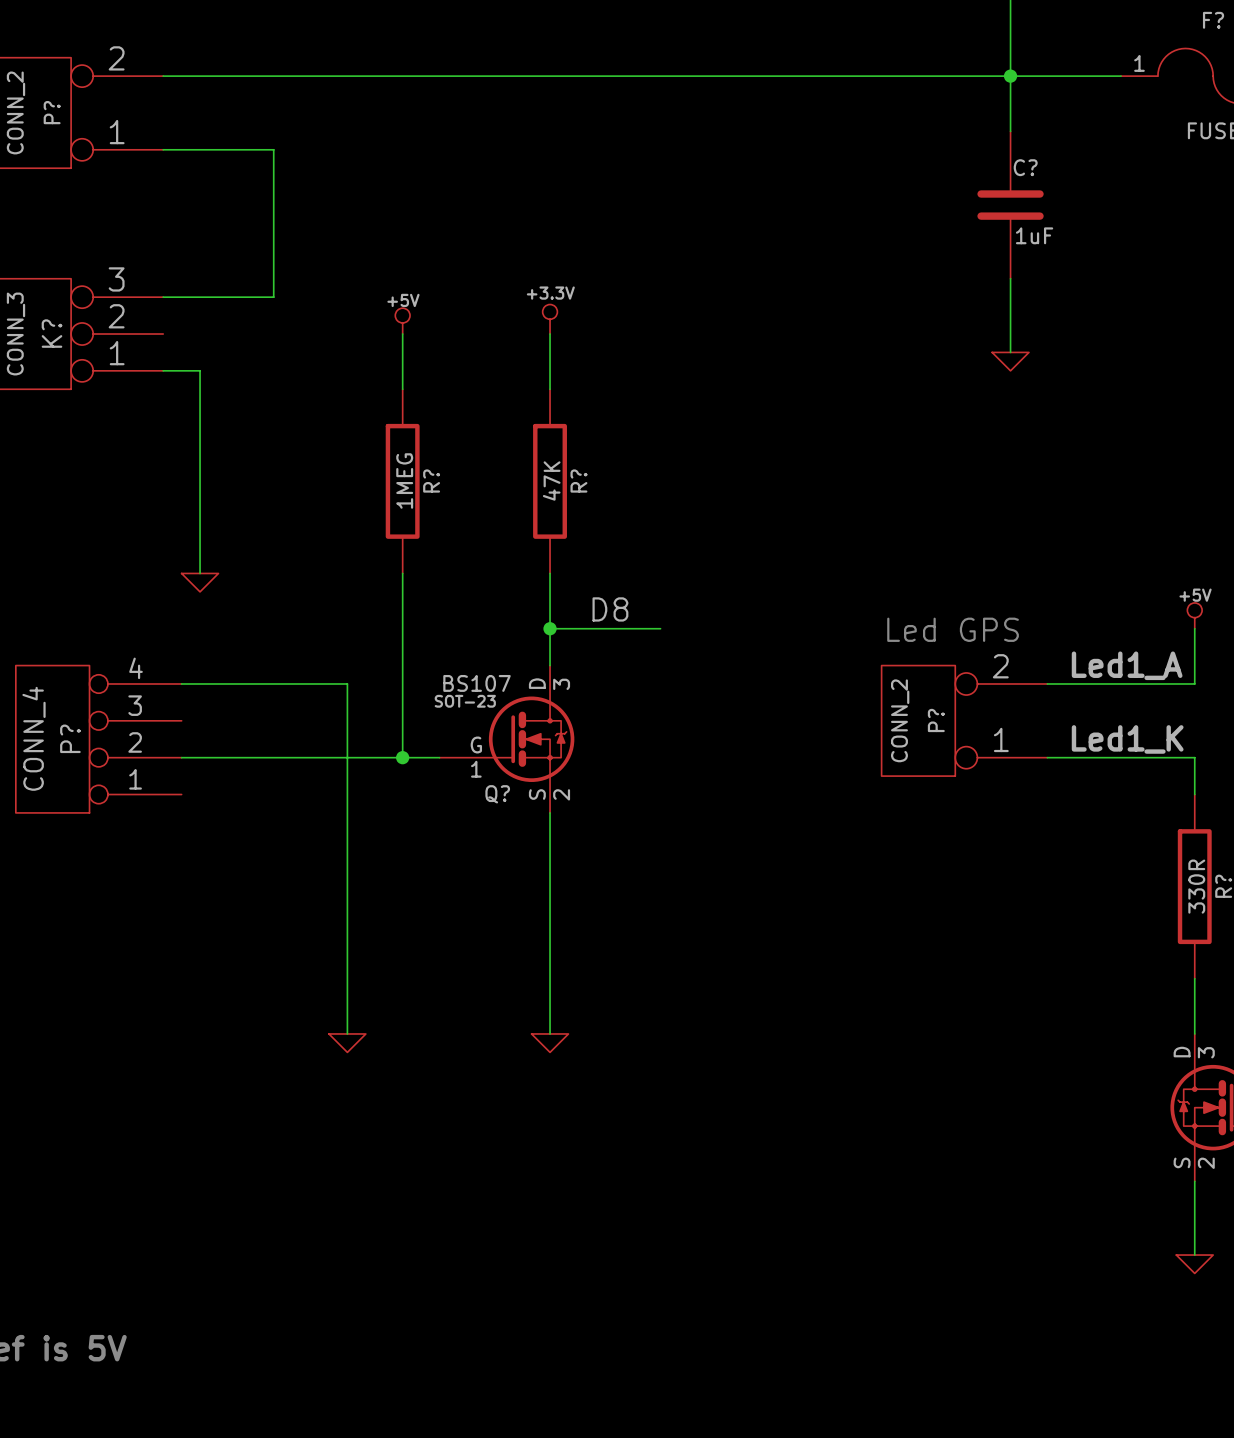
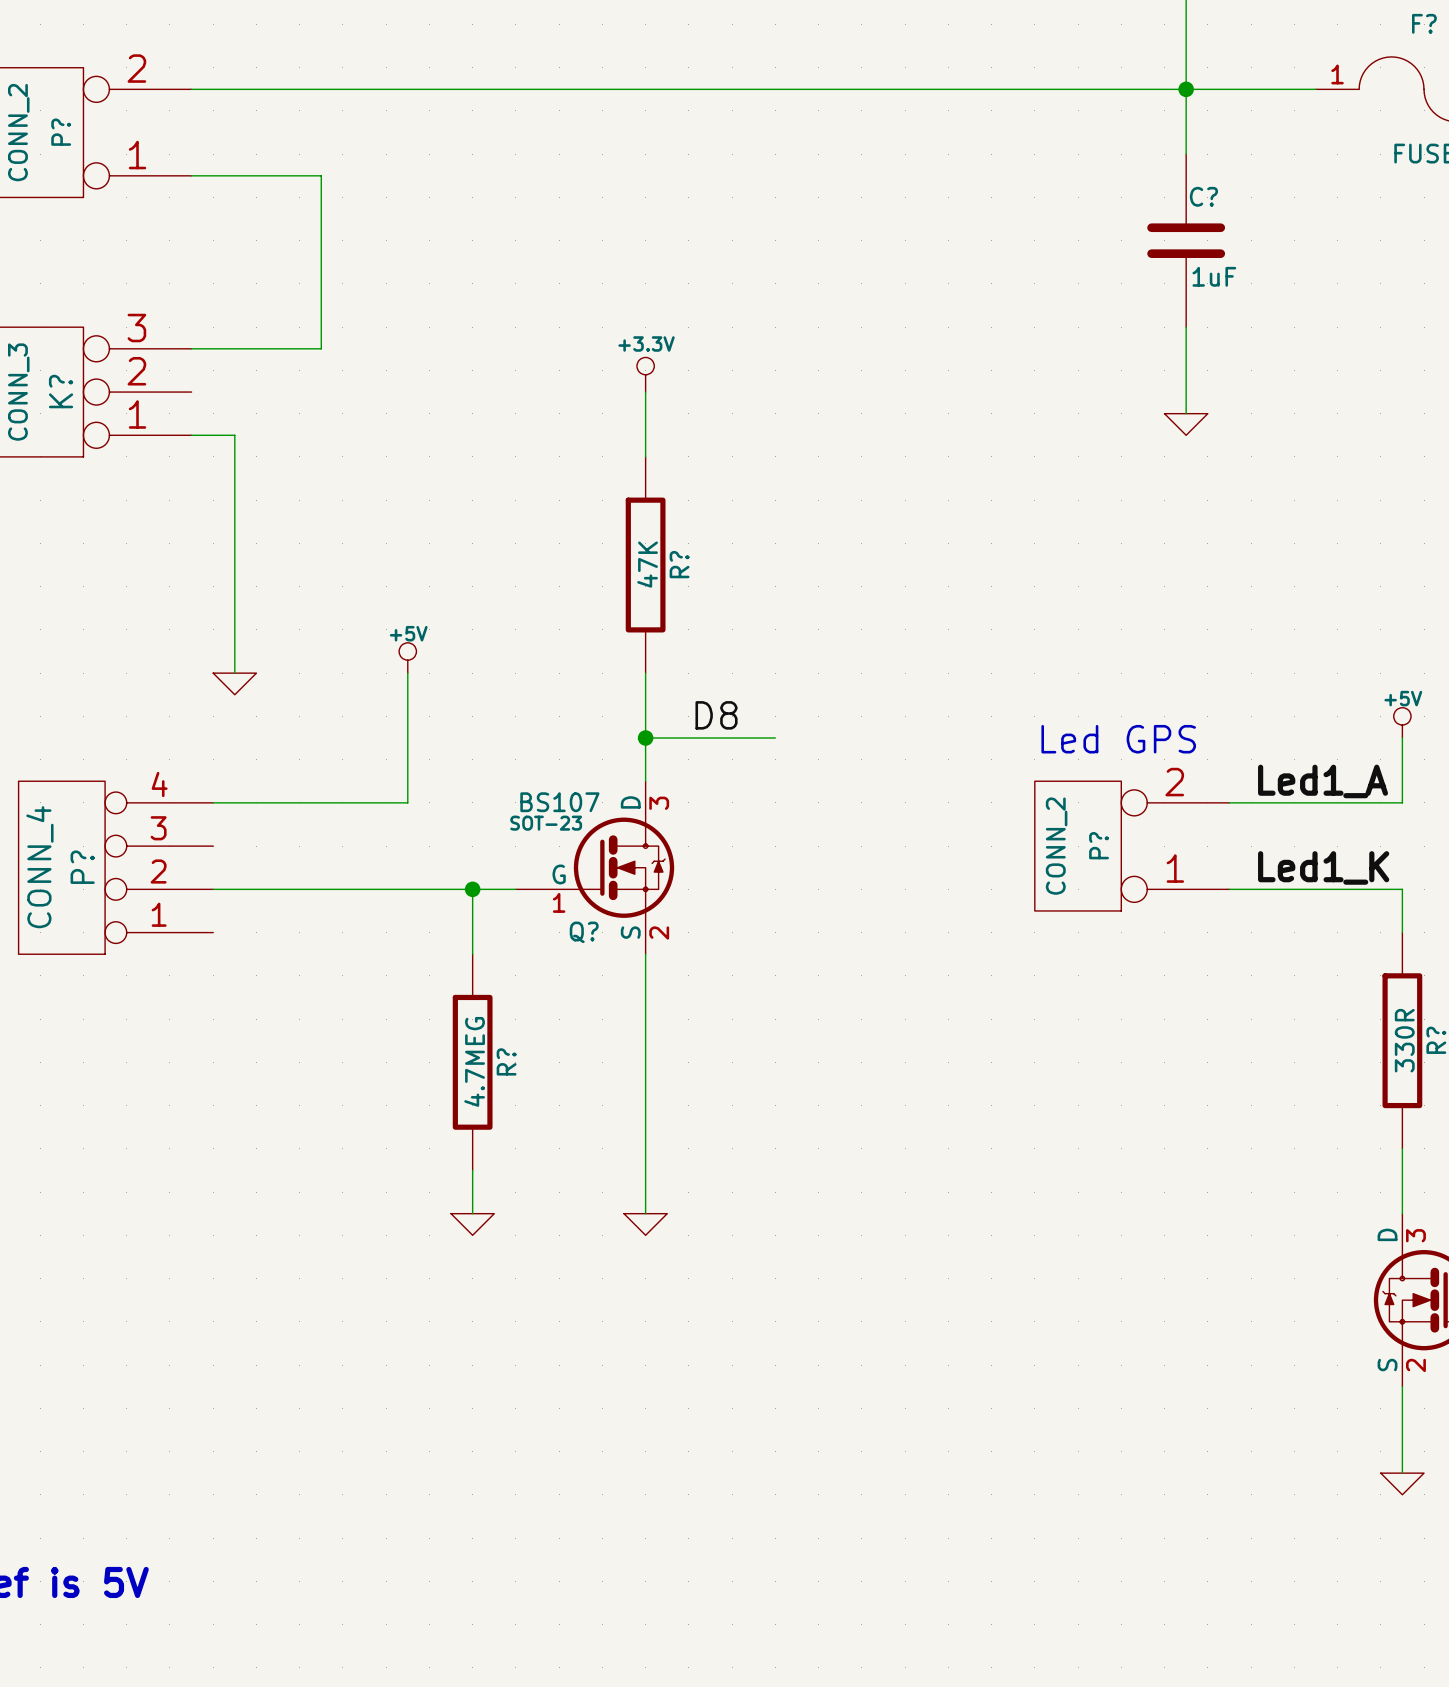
power symbol position: +5V (402, 321) -> +5V (407, 658)
wire: (402, 334) (402, 389) -> none
R?: 1MEG (402, 481) -> none
wire: (402, 573) (402, 757) -> (472, 954) (472, 889)
wire: (347, 683) (347, 1033) -> (407, 802) (407, 673)
R?: none -> 4.7MEG (472, 1062)
wire: none -> (472, 1170) (472, 1213)
power symbol position: (347, 1043) -> (472, 1224)

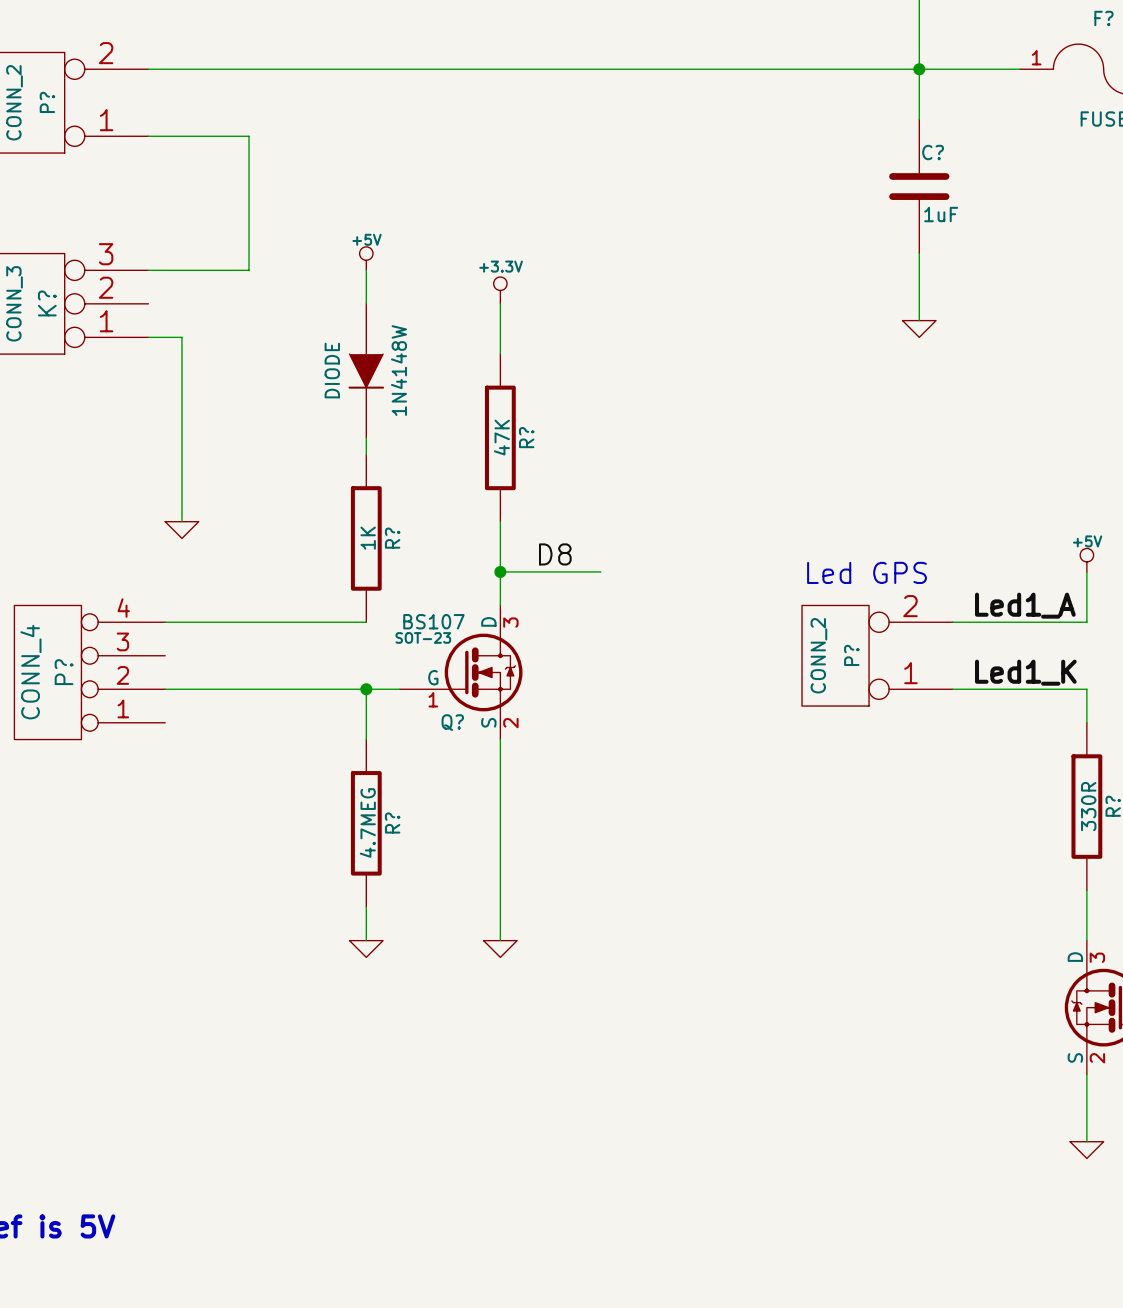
wire: none -> (366, 270) (366, 303)
1N4148W: none -> DIODE (366, 370)
wire: none -> (366, 437) (366, 454)
power symbol position: +5V (407, 658) -> +5V (366, 258)
wire: (407, 673) (407, 802) -> (366, 622) (316, 622)
R?: none -> 1K (366, 538)

